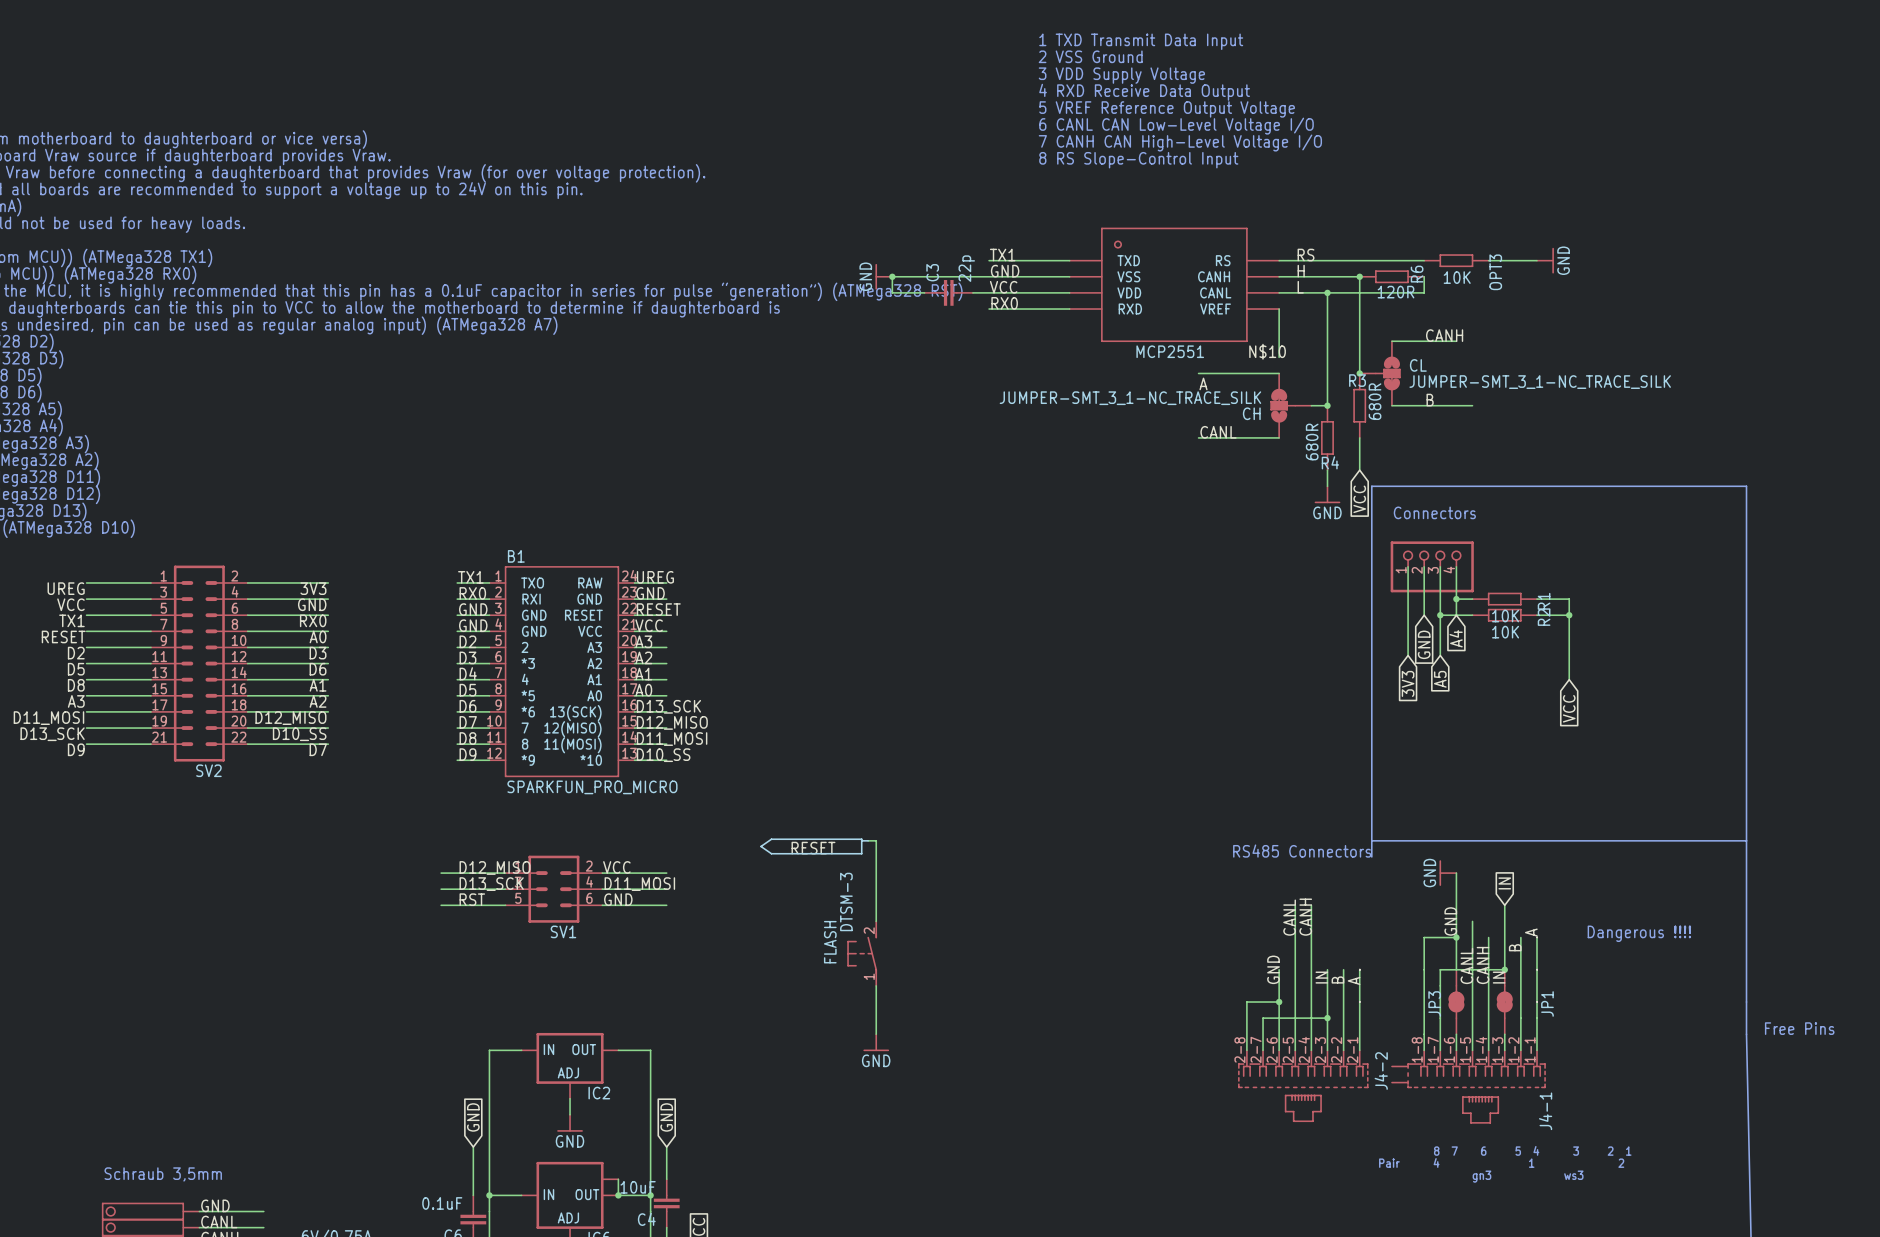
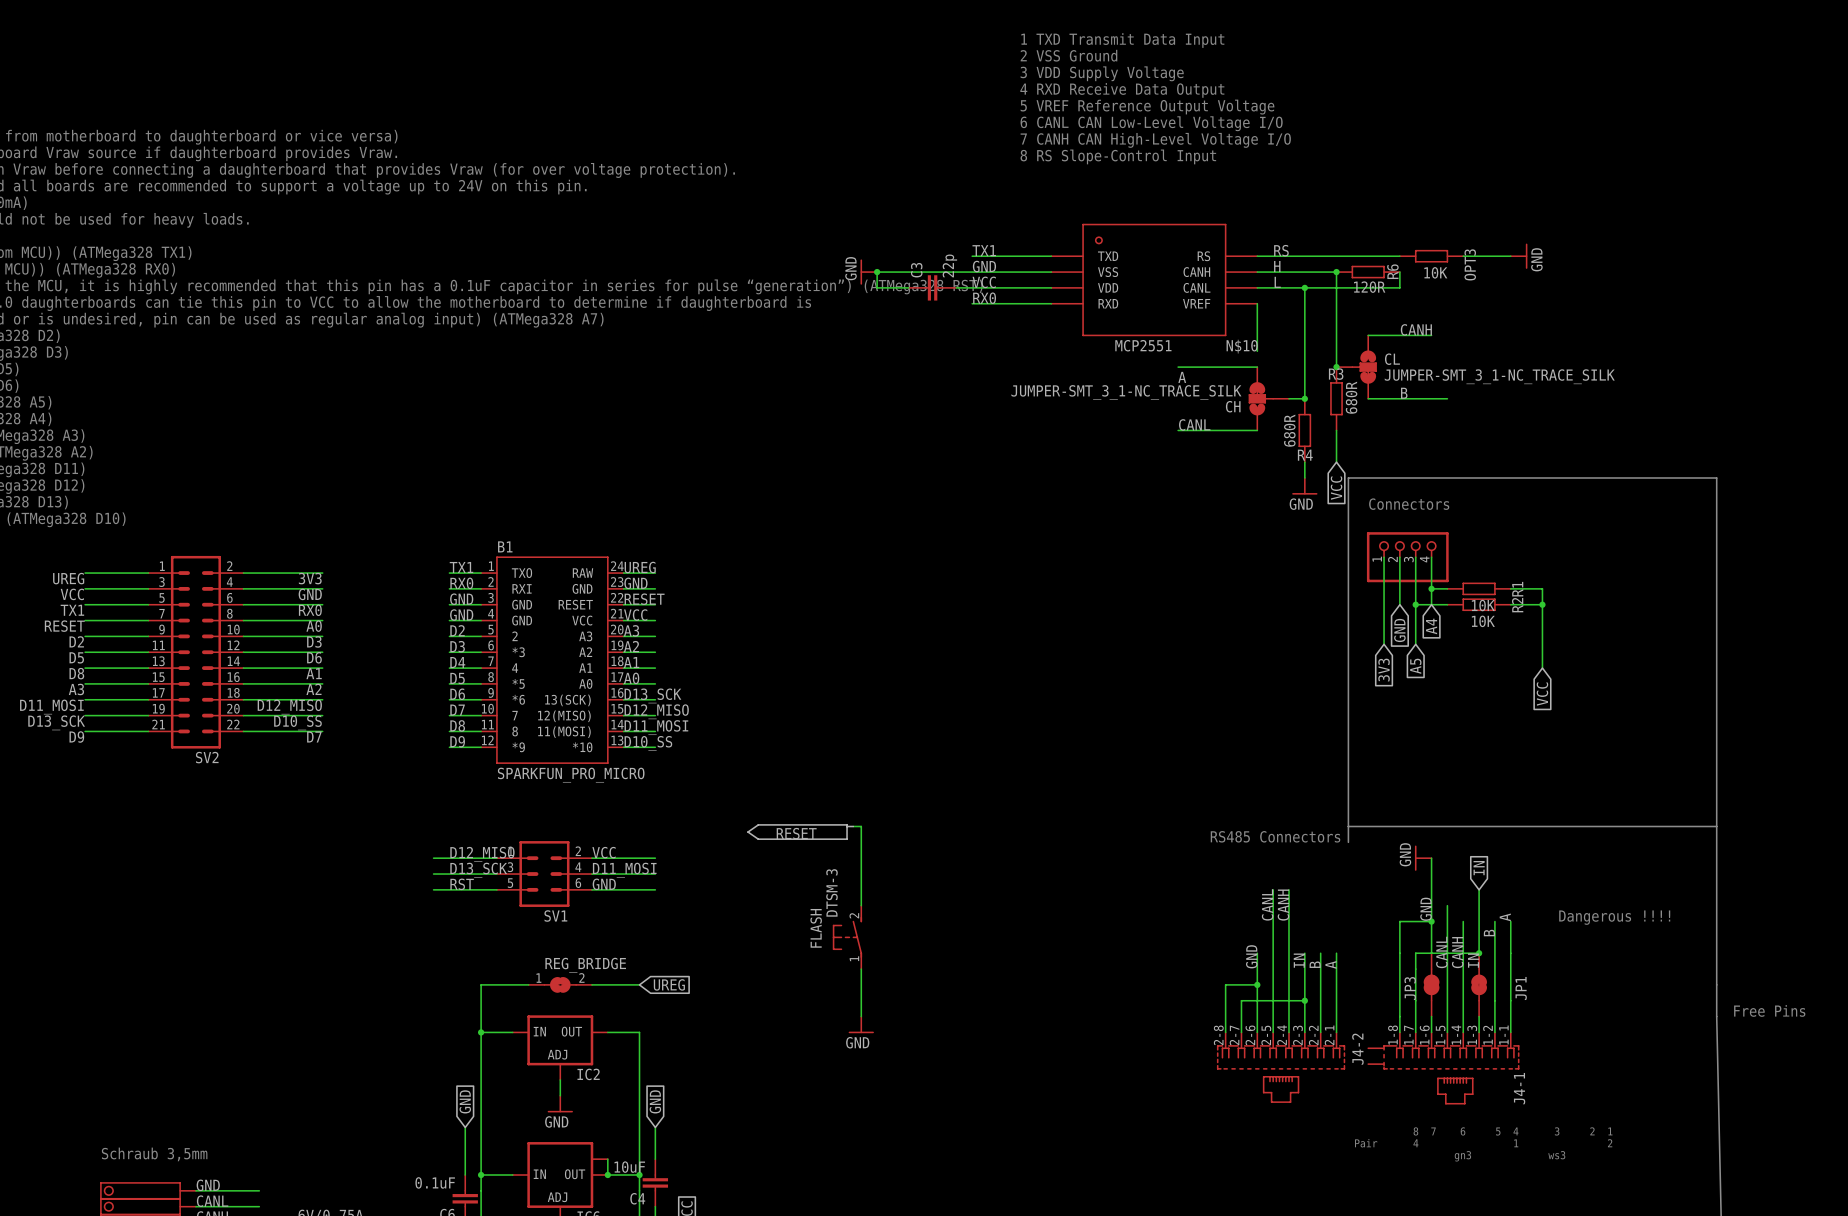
wire: none -> (528, 984) (481, 984) (481, 1032)
REG_BRIDGE: none -> (560, 984)
wire: none -> (591, 984) (639, 984)
global label: none -> UREG (669, 984)
junction: none -> (481, 1032)

